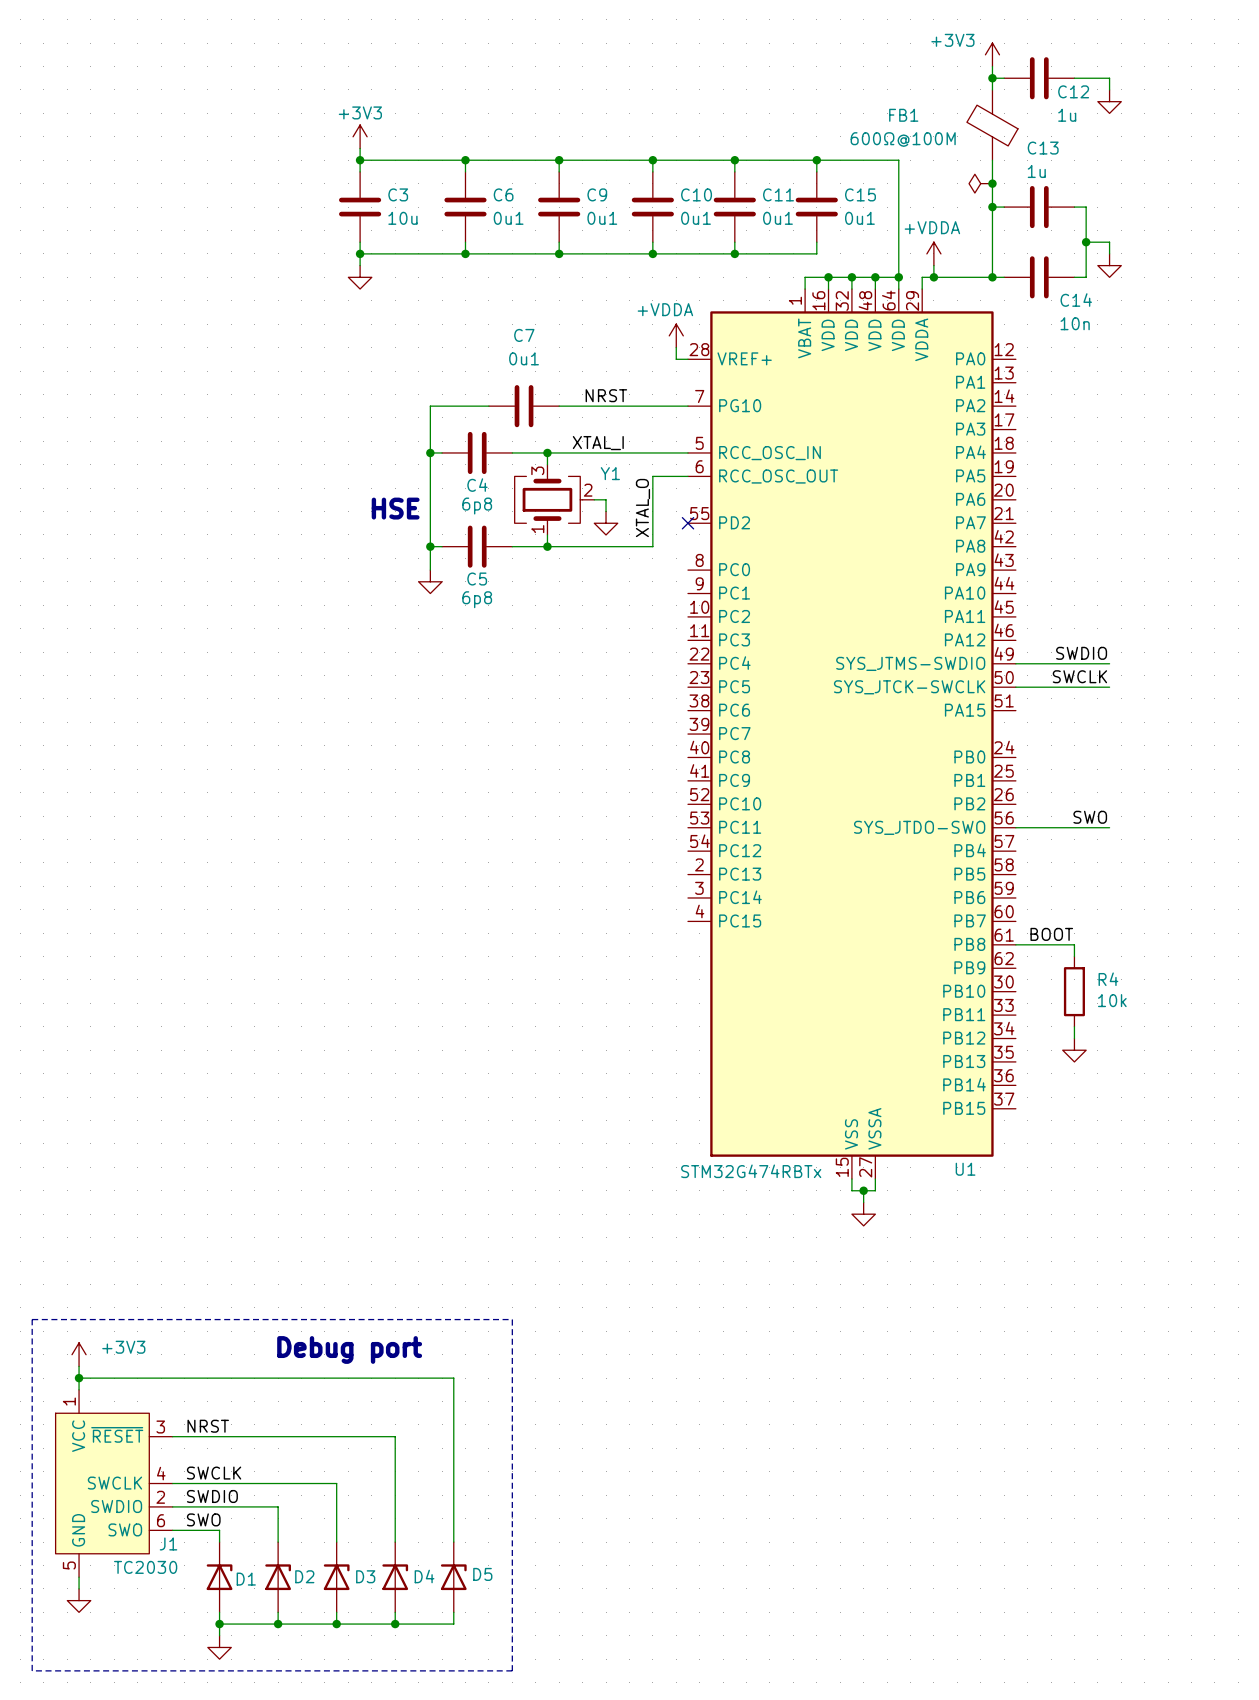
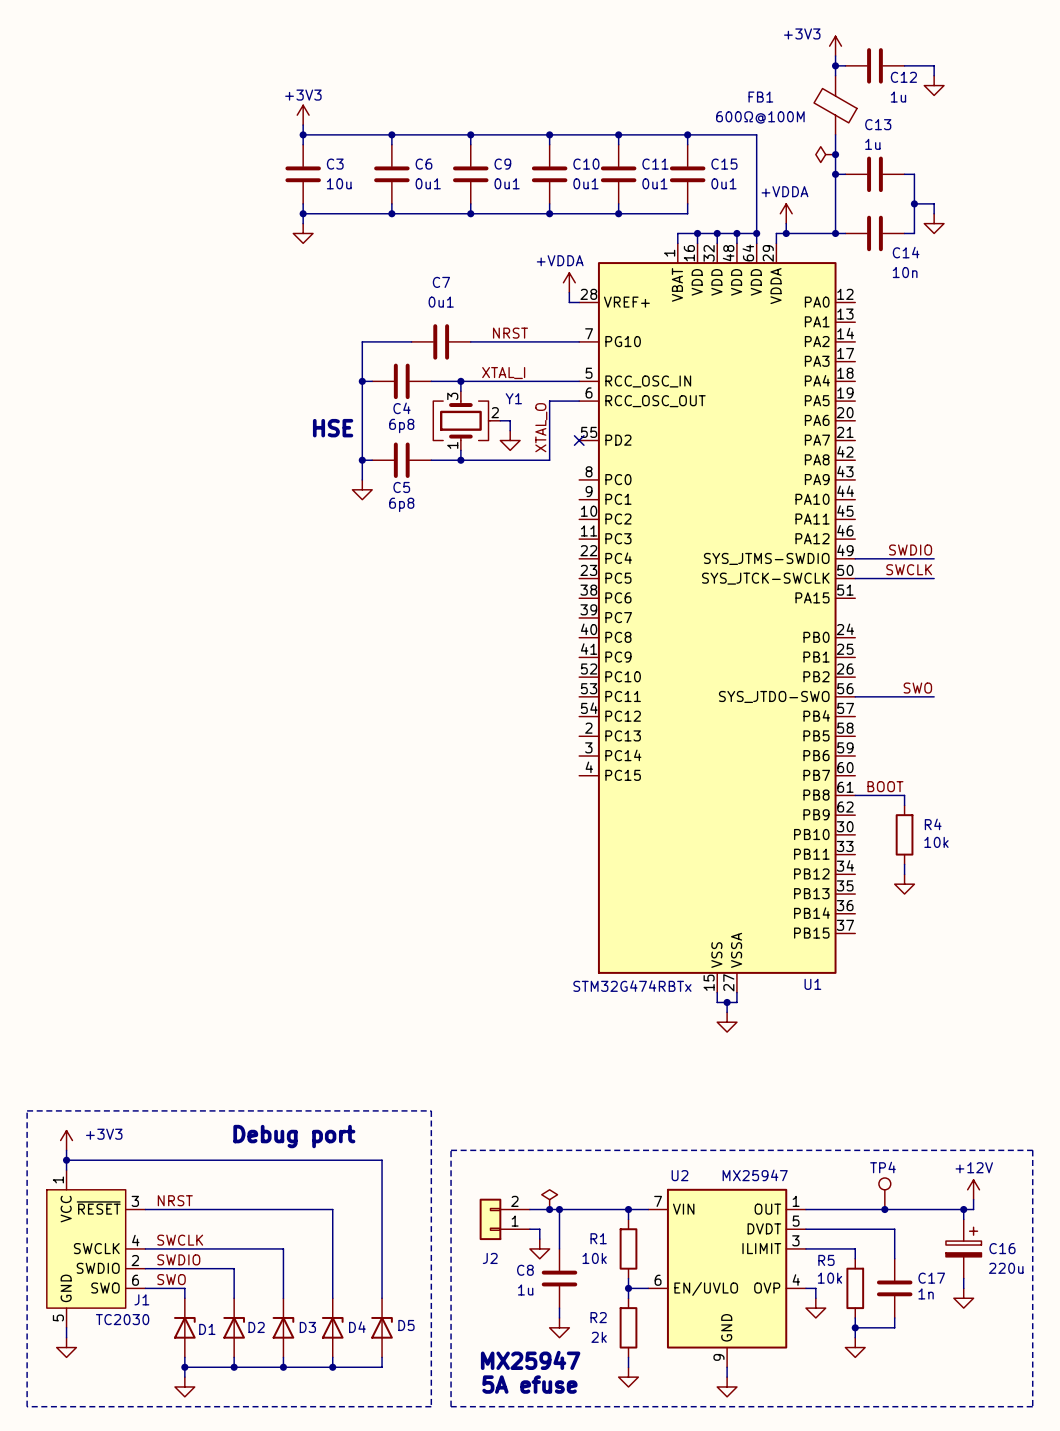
line: none -> (451, 1150) (1032, 1150) (1032, 1406) (451, 1406) (451, 1150)
power symbol: none -> +12V (973, 1189)
TP4: none -> (884, 1193)
power symbol: none -> (549, 1199)
wire: none -> (973, 1199) (973, 1209) (805, 1209)
wire: none -> (529, 1209) (648, 1209)
junction: none -> (549, 1209)
wire: none -> (559, 1209) (559, 1248)
junction: none -> (559, 1209)
wire: none -> (628, 1209) (628, 1219)
junction: none -> (628, 1209)
junction: none -> (884, 1209)
wire: none -> (963, 1209) (963, 1219)
junction: none -> (963, 1209)
J2: none -> (504, 1219)
wire: none -> (529, 1229) (539, 1229) (539, 1239)
wire: none -> (805, 1229) (894, 1229) (894, 1258)
power symbol: none -> (539, 1248)
R1: none -> 10k (628, 1248)
wire: none -> (805, 1248) (855, 1248) (855, 1258)
C16: none -> 220u (963, 1248)
C8: none -> 1u (559, 1278)
wire: none -> (628, 1278) (628, 1298)
U2: none -> MX25947 (727, 1278)
wire: none -> (963, 1278) (963, 1288)
wire: none -> (628, 1288) (648, 1288)
junction: none -> (628, 1288)
wire: none -> (805, 1288) (815, 1288) (815, 1298)
R5: none -> 10k (855, 1288)
C17: none -> 1n (894, 1288)
power symbol: none -> (963, 1298)
wire: none -> (559, 1308) (559, 1317)
power symbol: none -> (815, 1308)
wire: none -> (855, 1317) (855, 1337)
wire: none -> (894, 1317) (894, 1327) (855, 1327)
power symbol: none -> (559, 1327)
R2: none -> 2k (628, 1327)
junction: none -> (855, 1327)
power symbol: none -> (855, 1347)
wire: none -> (628, 1357) (628, 1367)
text: none -> MX25947 (530, 1360)
wire: none -> (727, 1367) (727, 1377)
power symbol: none -> (628, 1377)
text: none -> 5A efuse (529, 1384)
power symbol: none -> (727, 1386)

